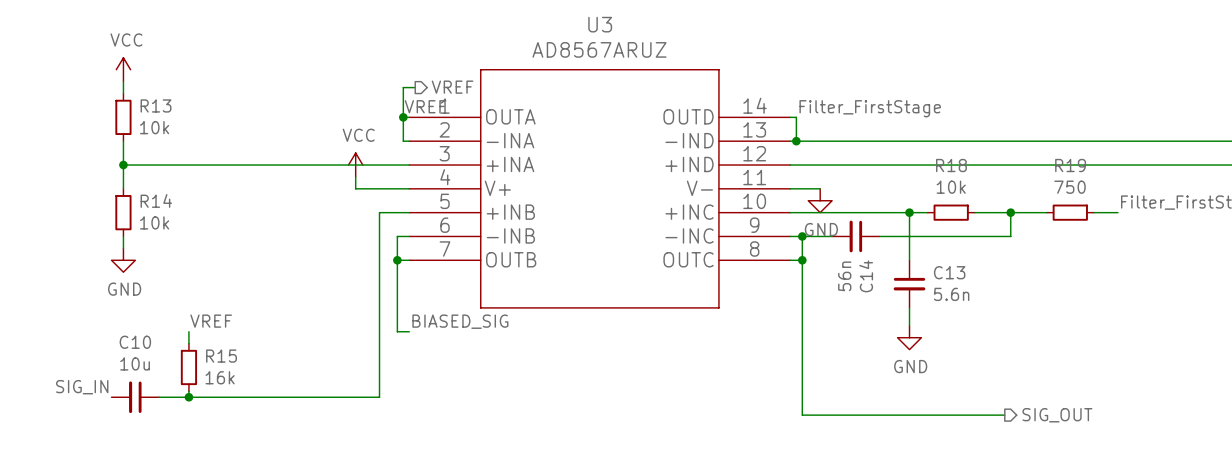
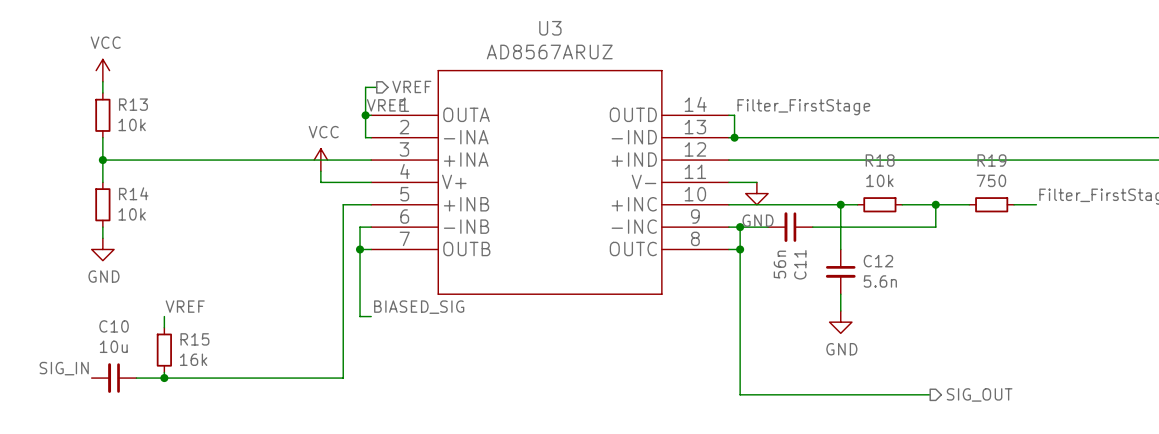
C13 name: C13 (949, 272) -> C12 (878, 261)
C14 name: C14 (866, 276) -> C11 (800, 264)

